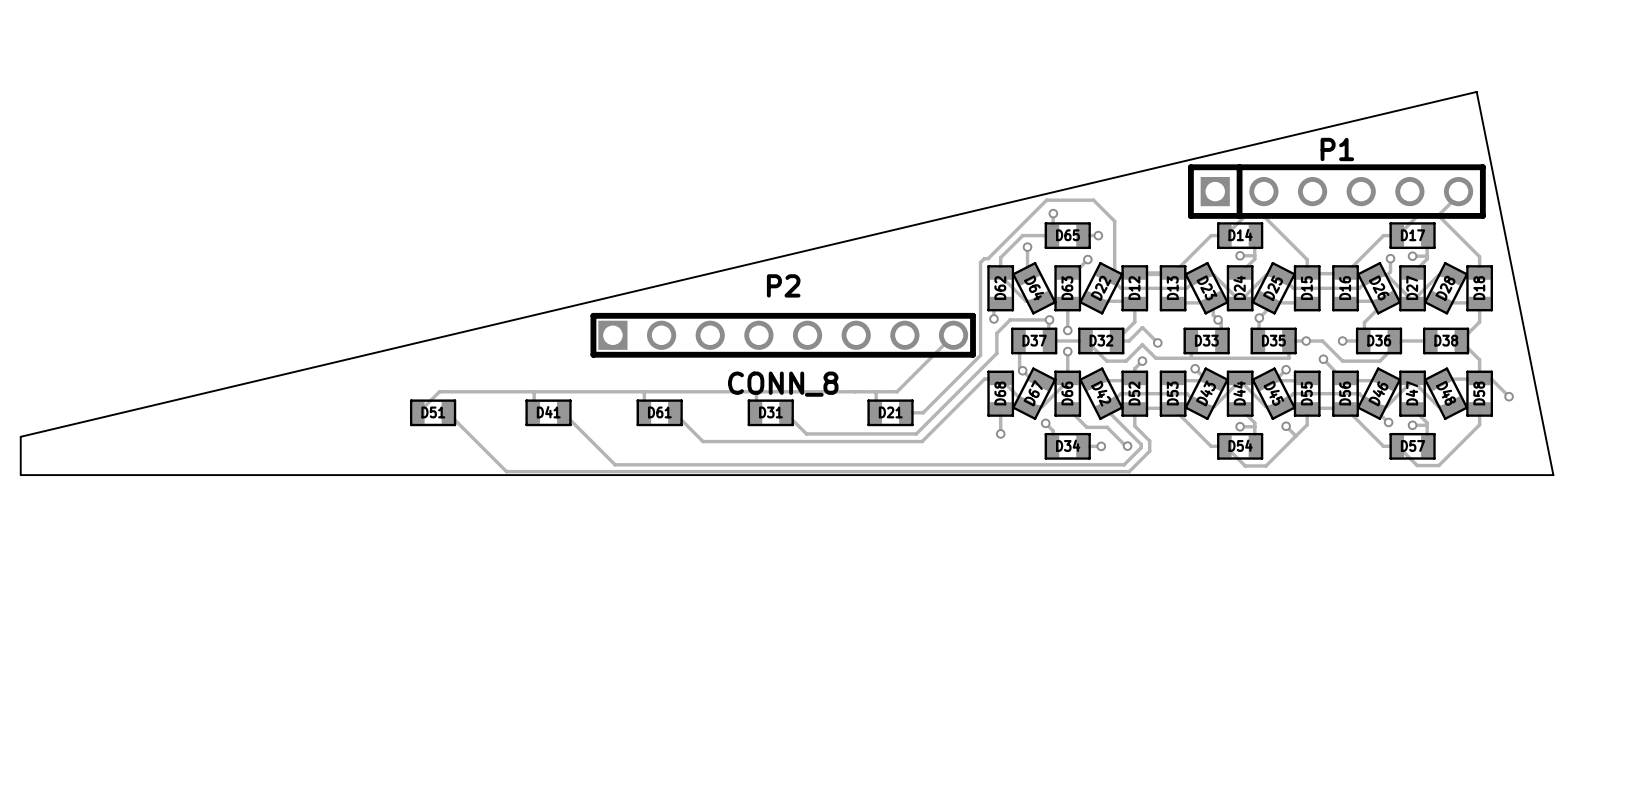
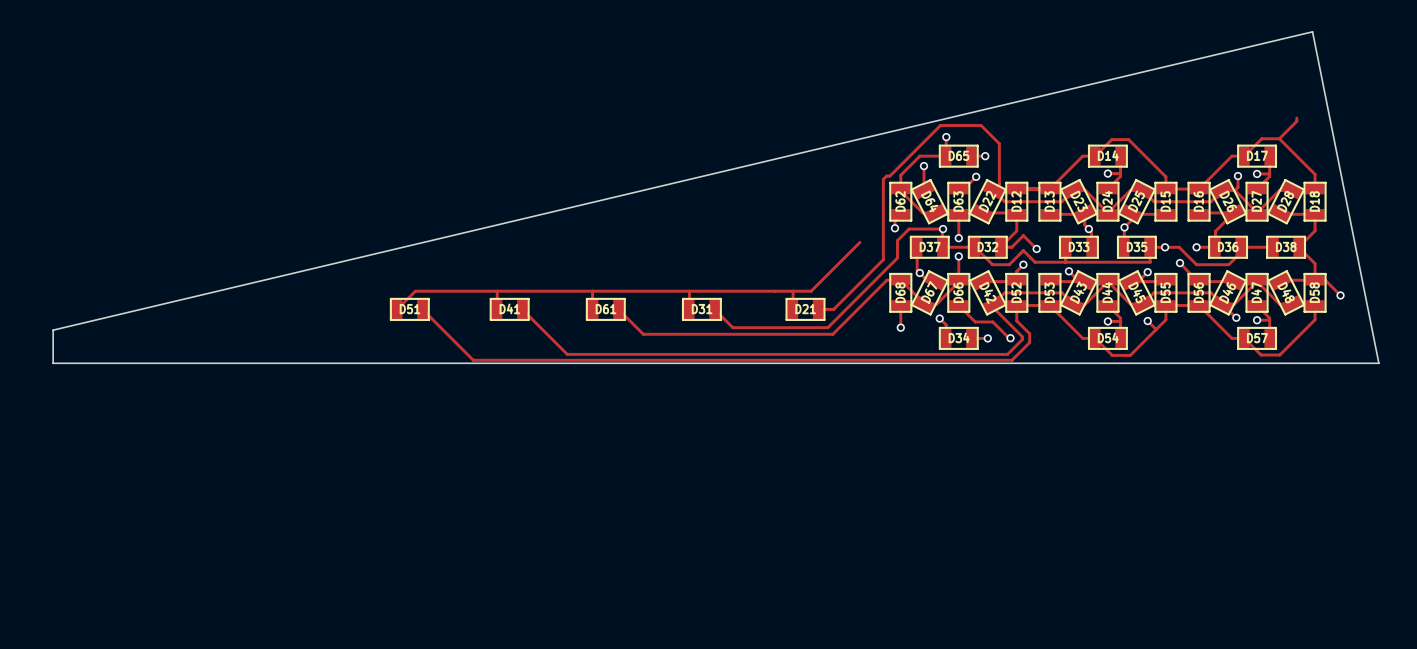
P1: (1336, 191) -> none
P2: CONN_8 (783, 335) -> none

